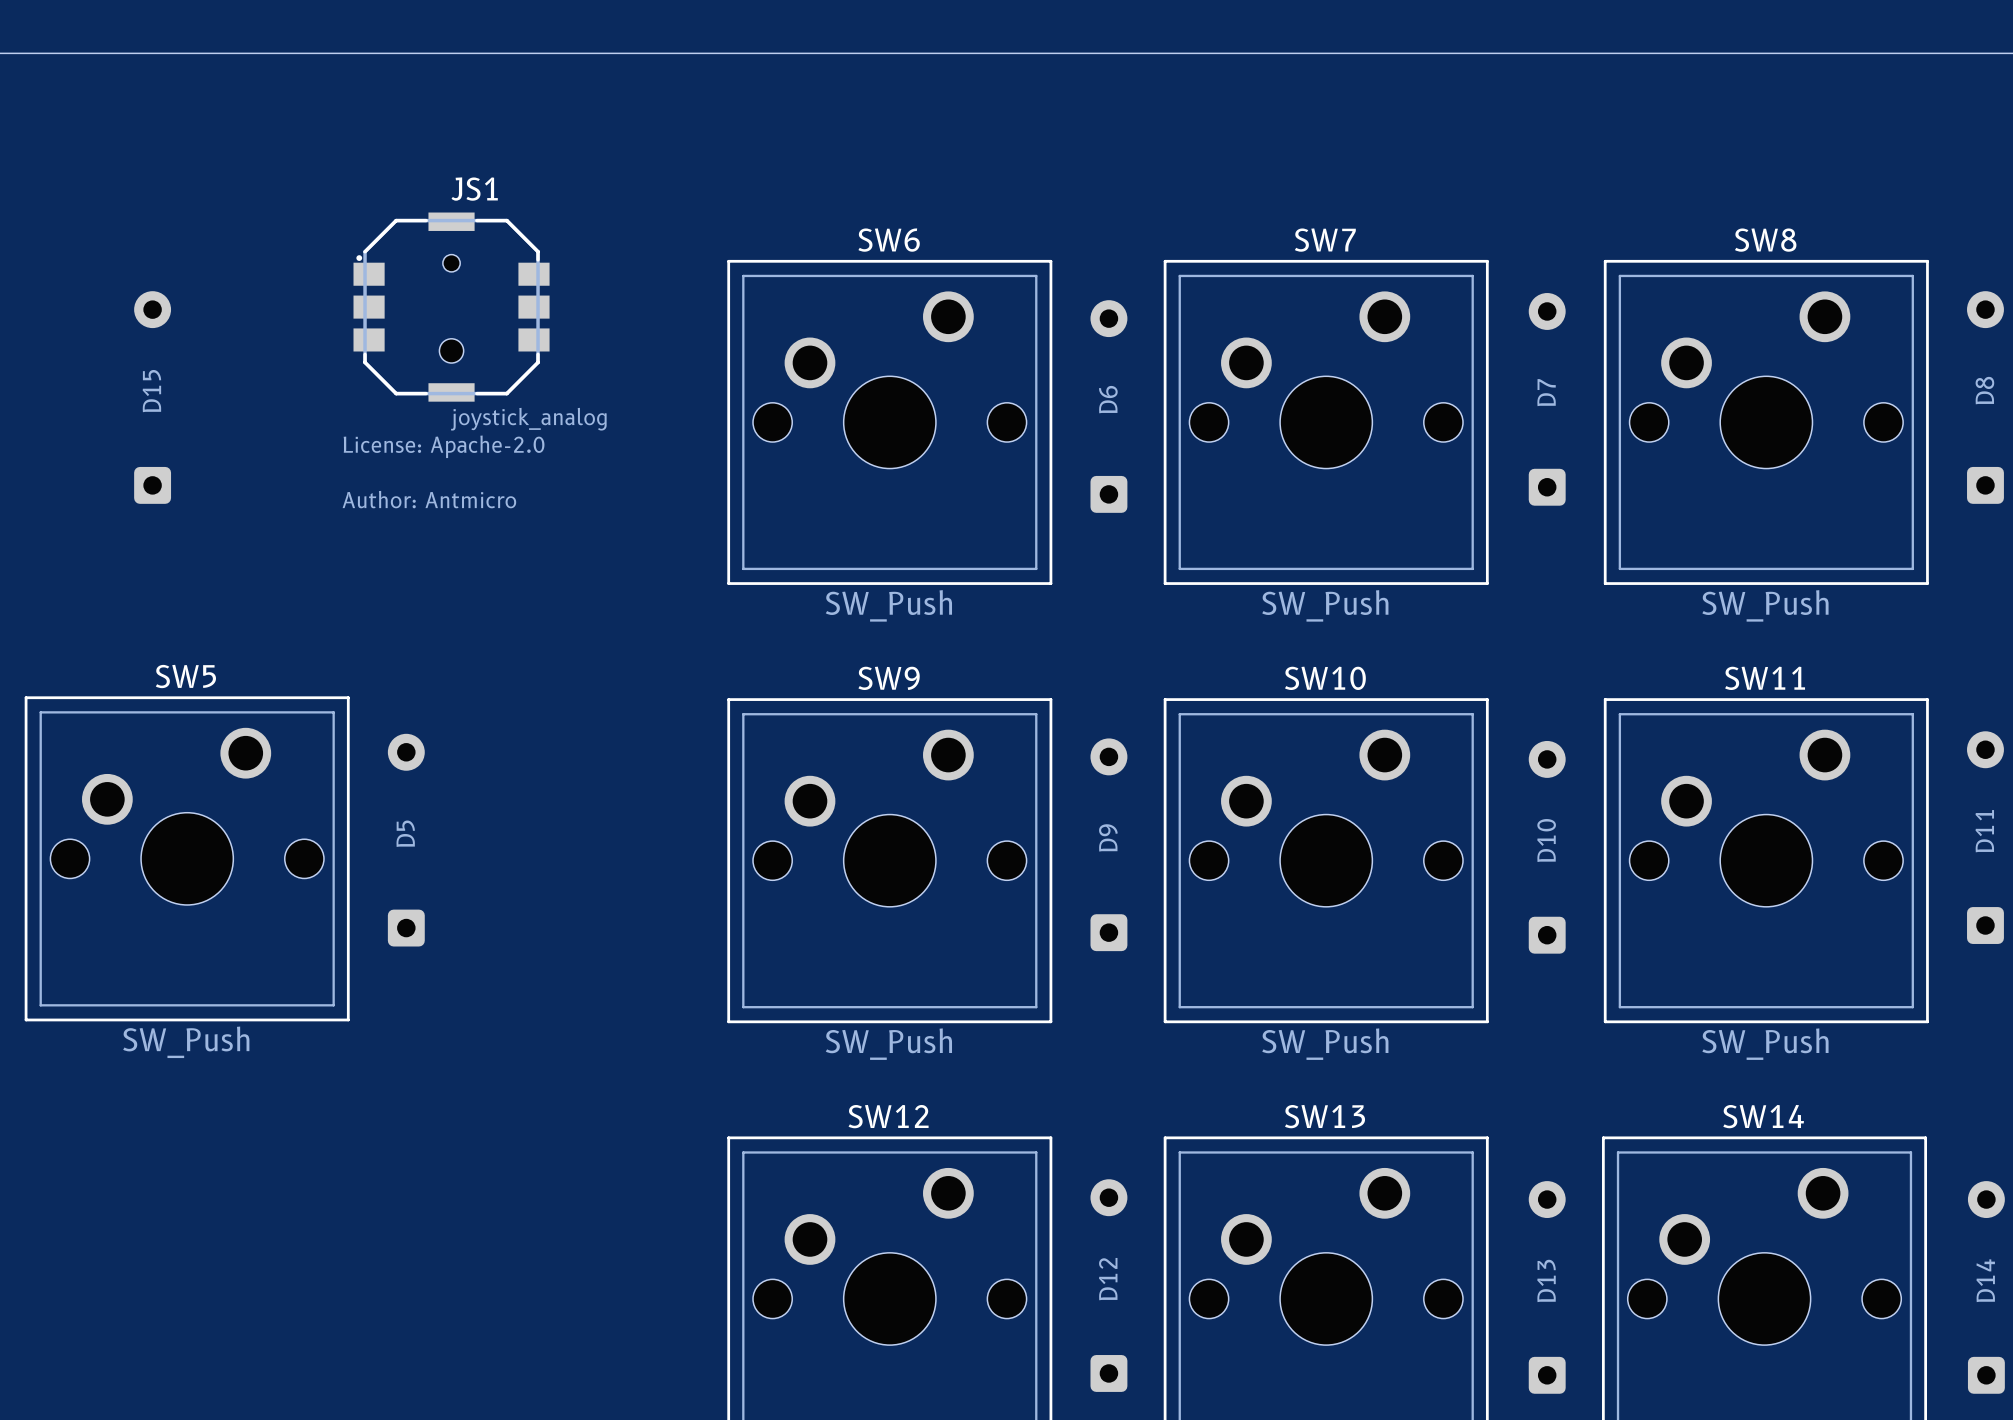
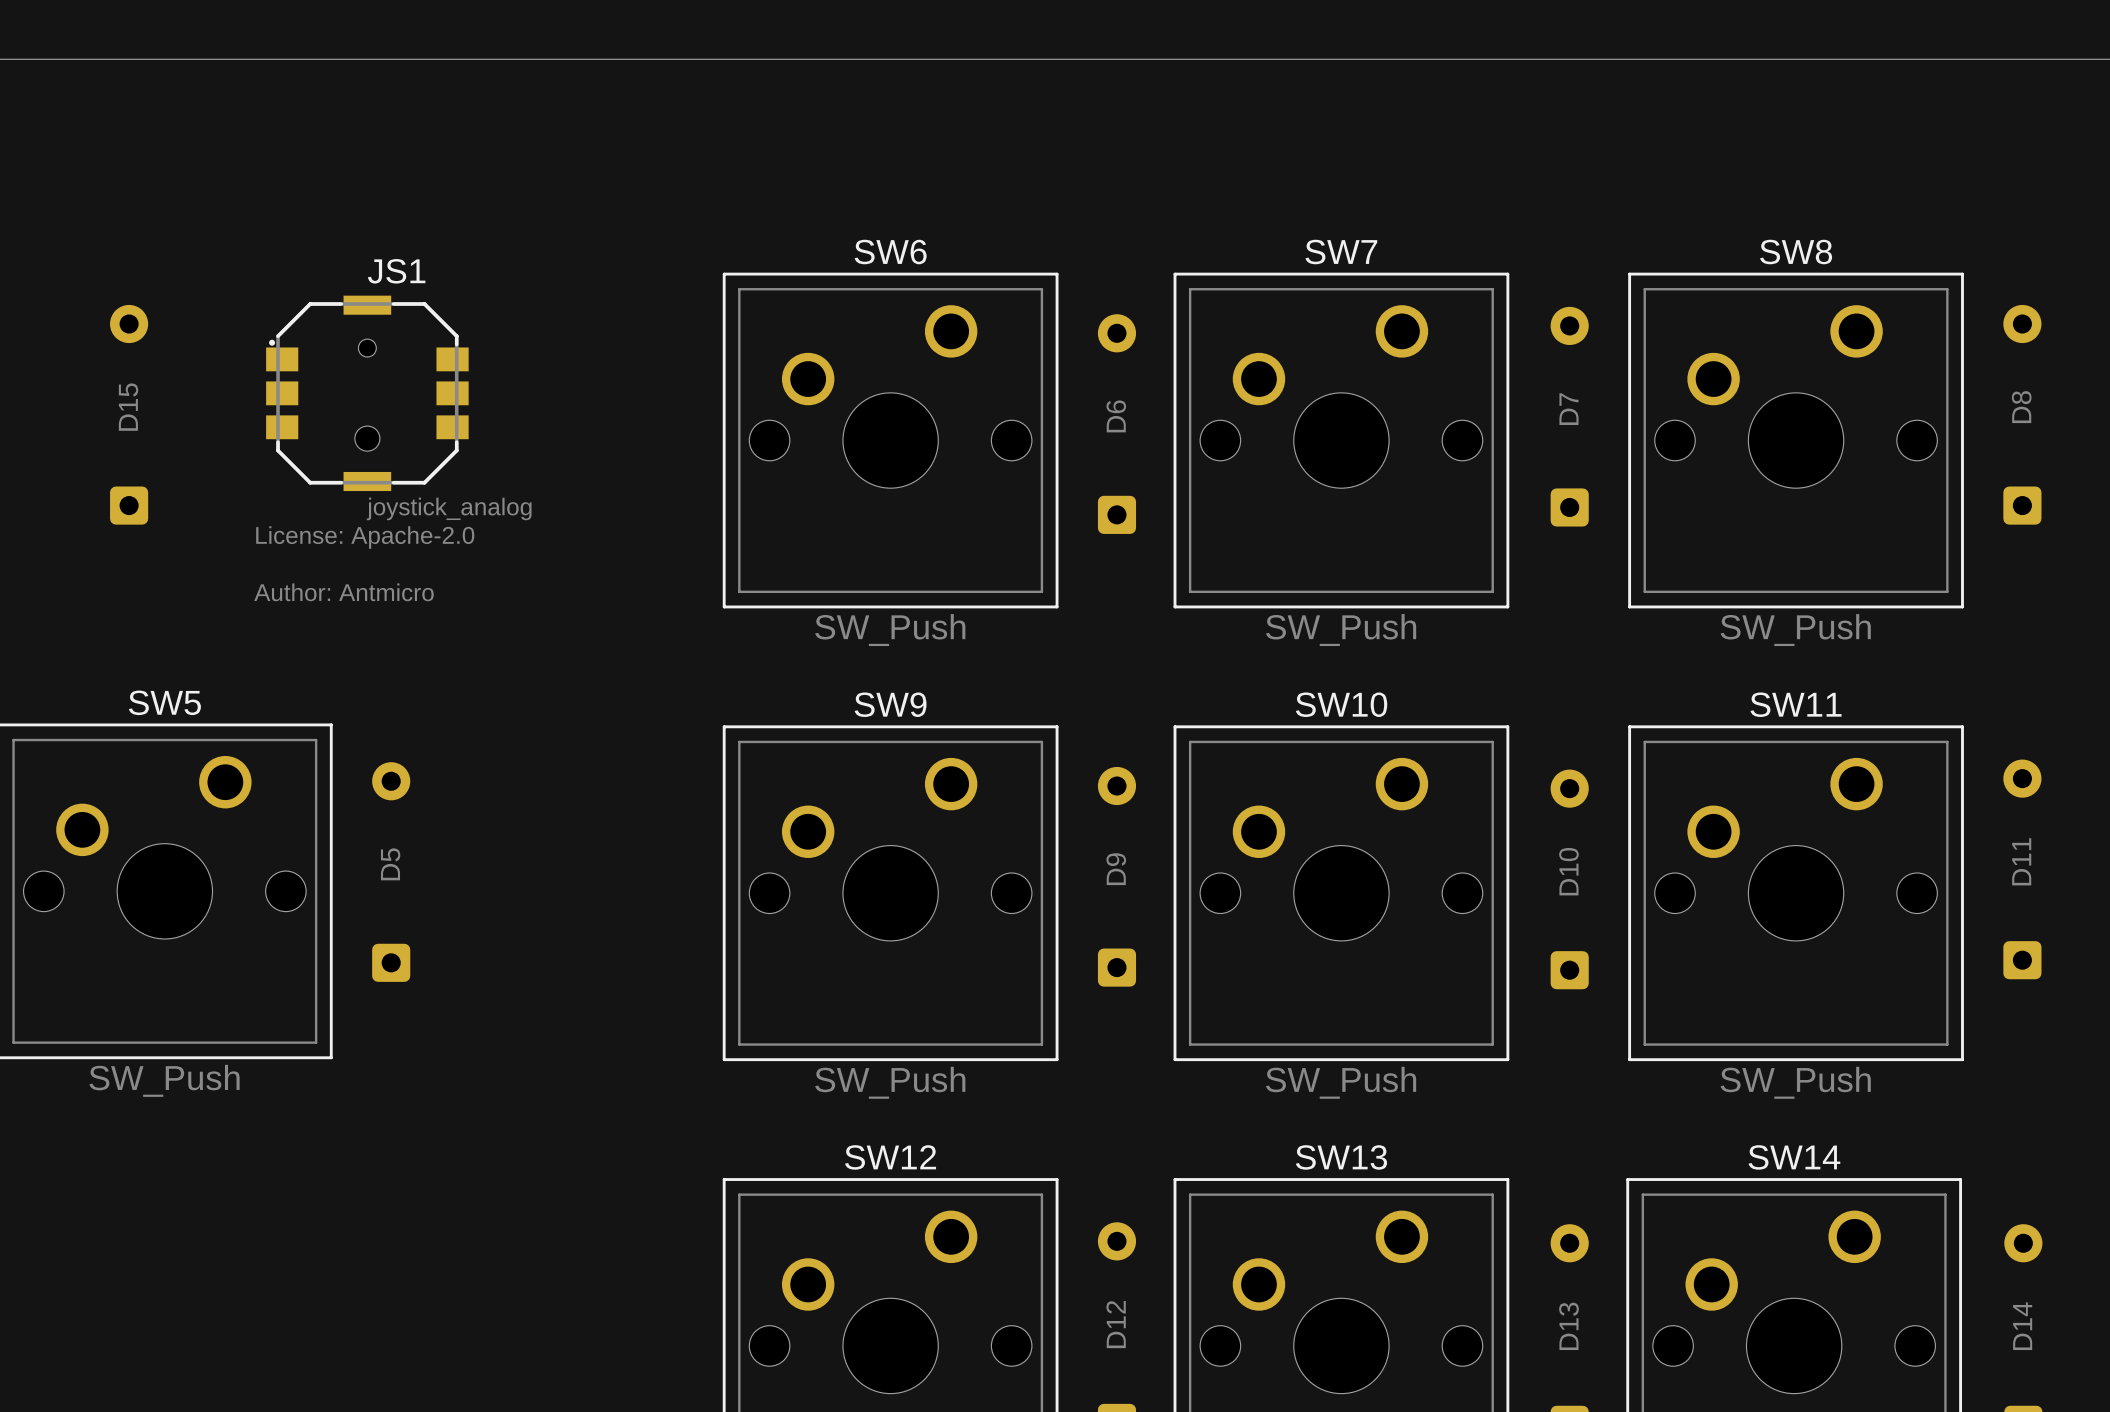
JS1 position: (451, 307) -> (367, 393)

